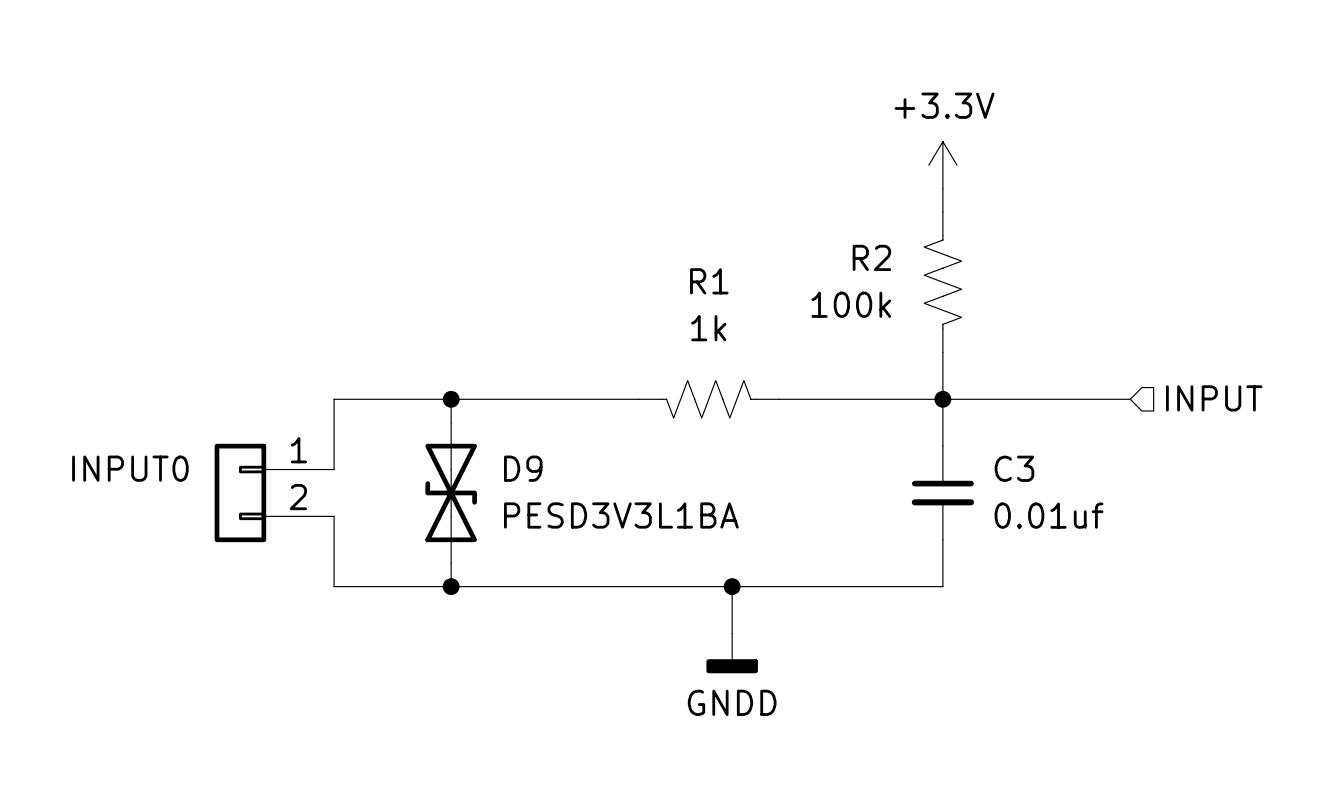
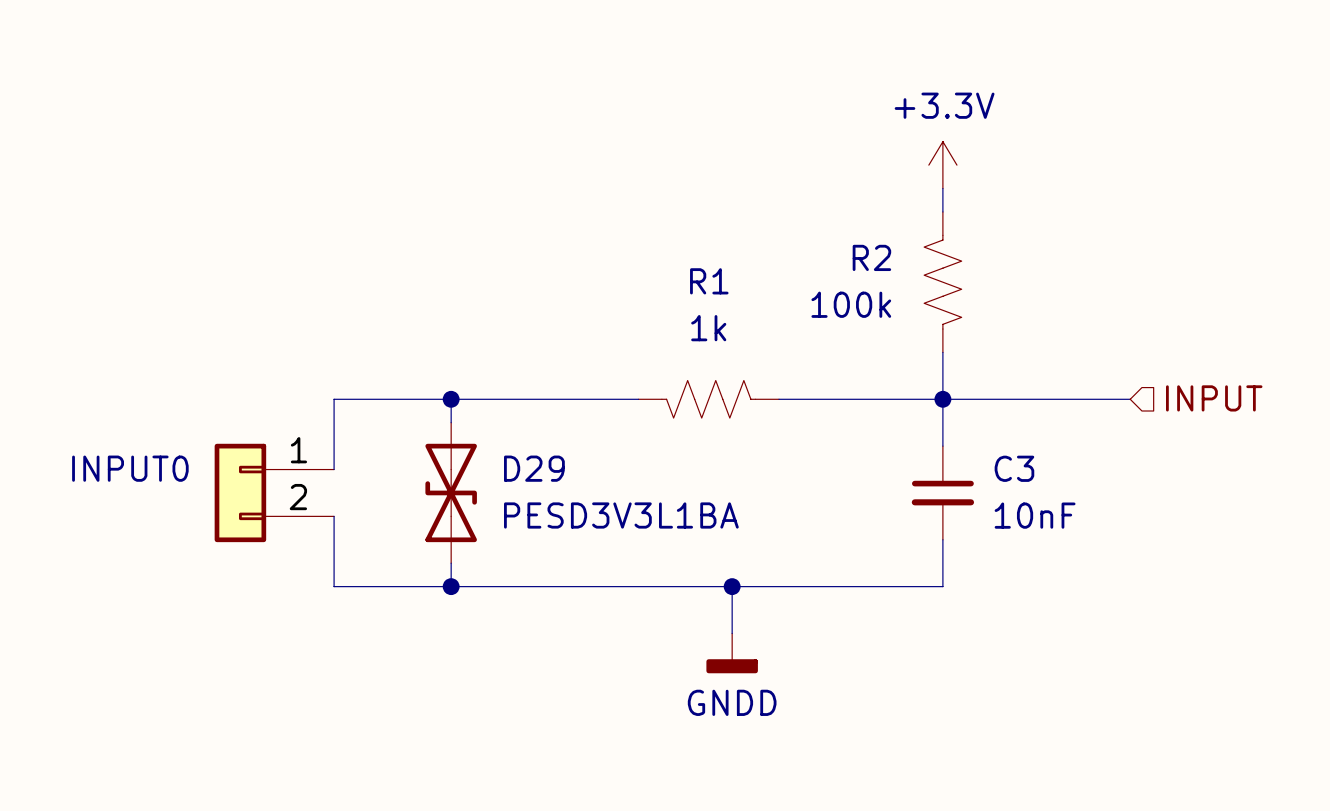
D9 name: D9 (523, 468) -> D29 (534, 468)
C3 value: 0.01uf (1049, 515) -> 10nF (1035, 515)

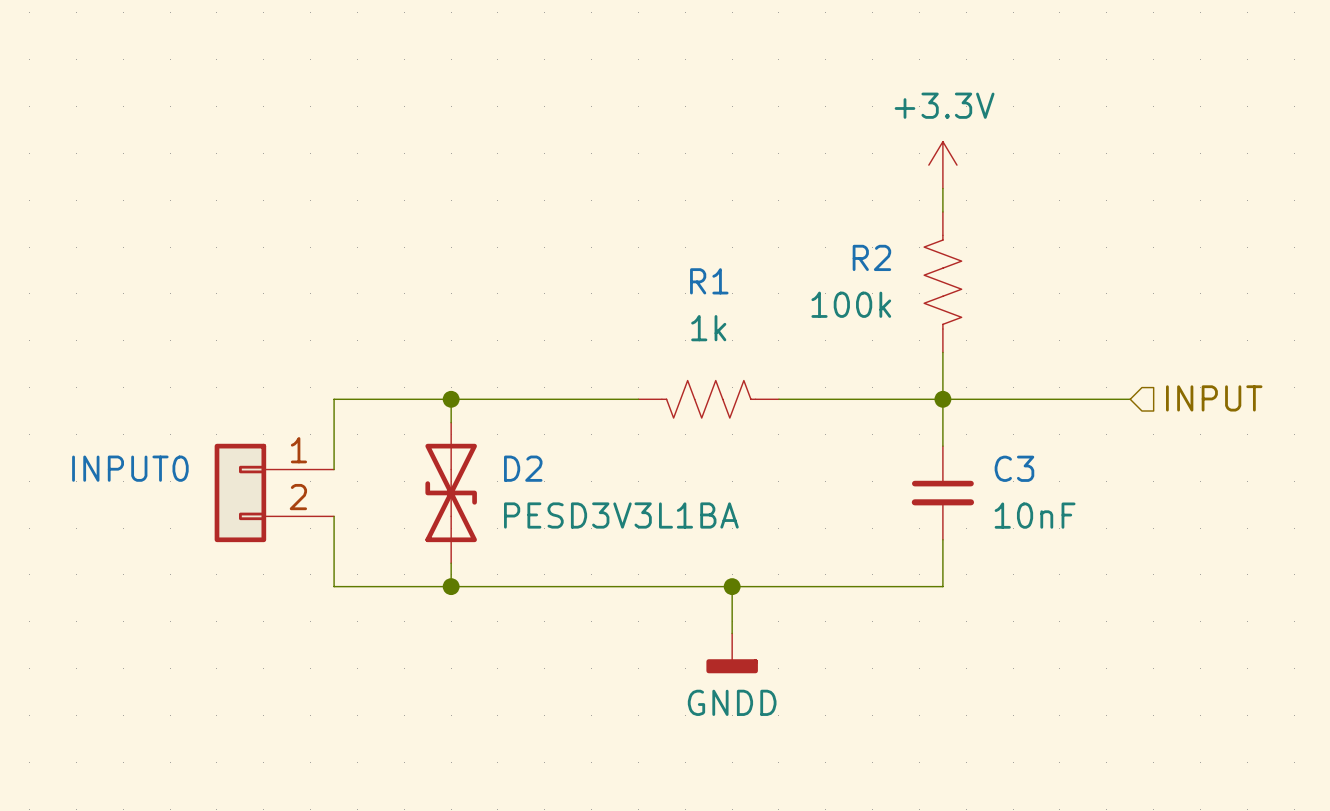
D29 name: D29 (534, 468) -> D2 (523, 468)

